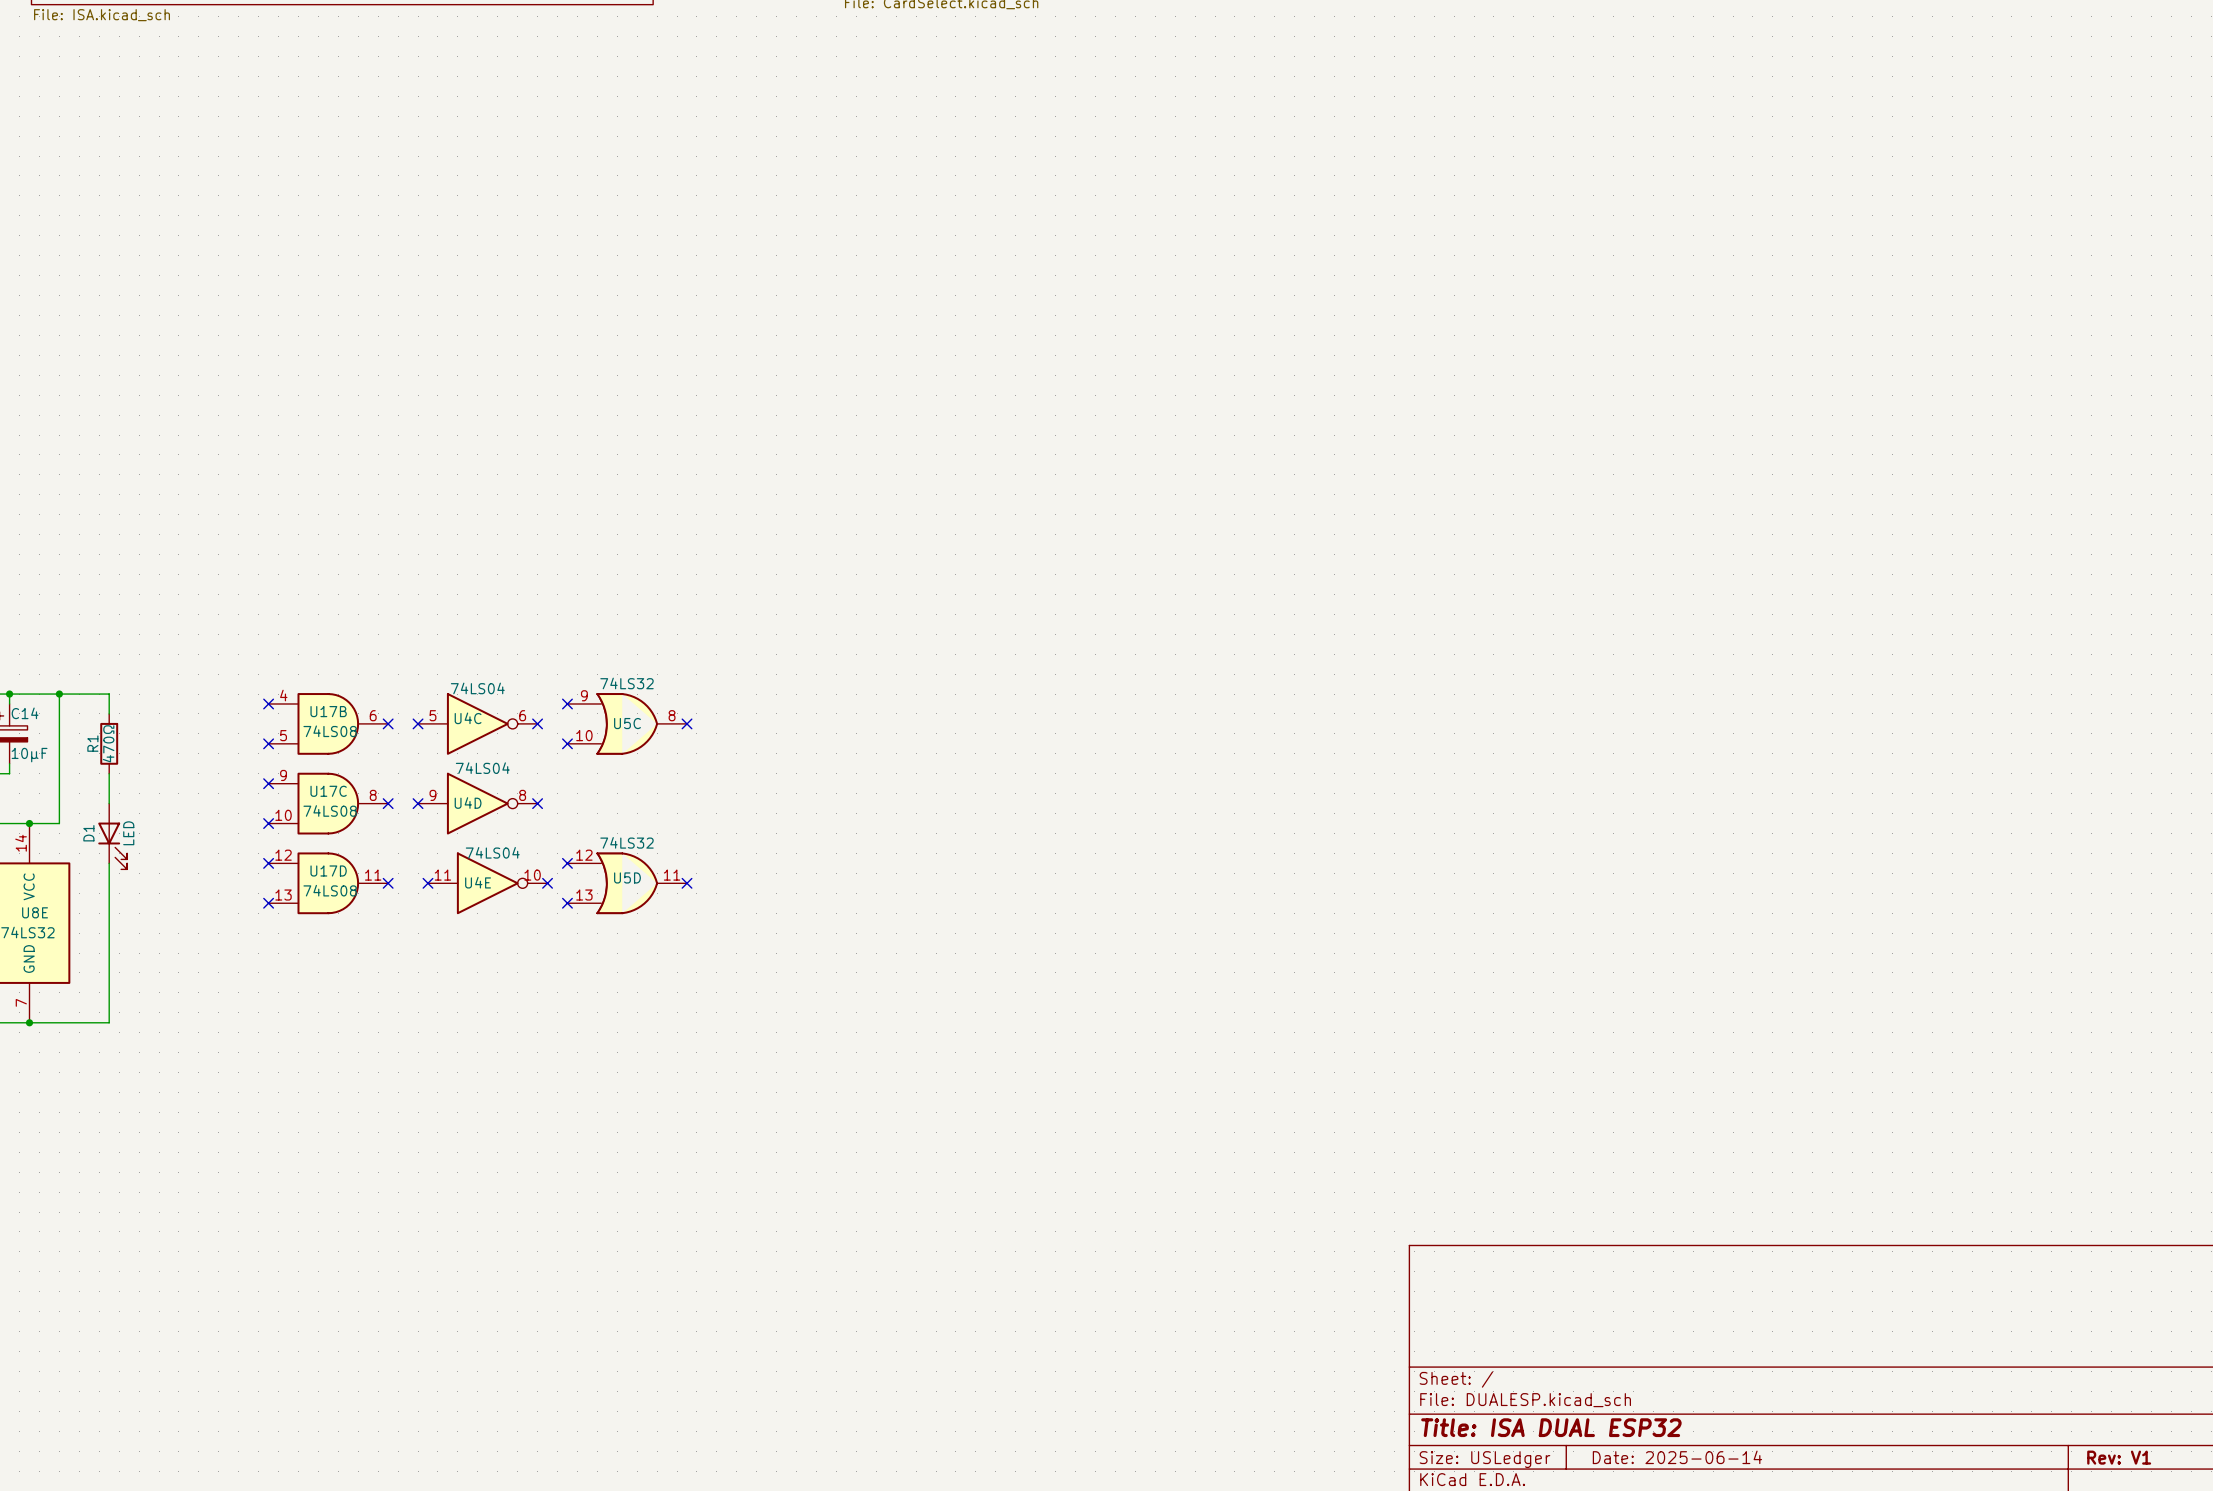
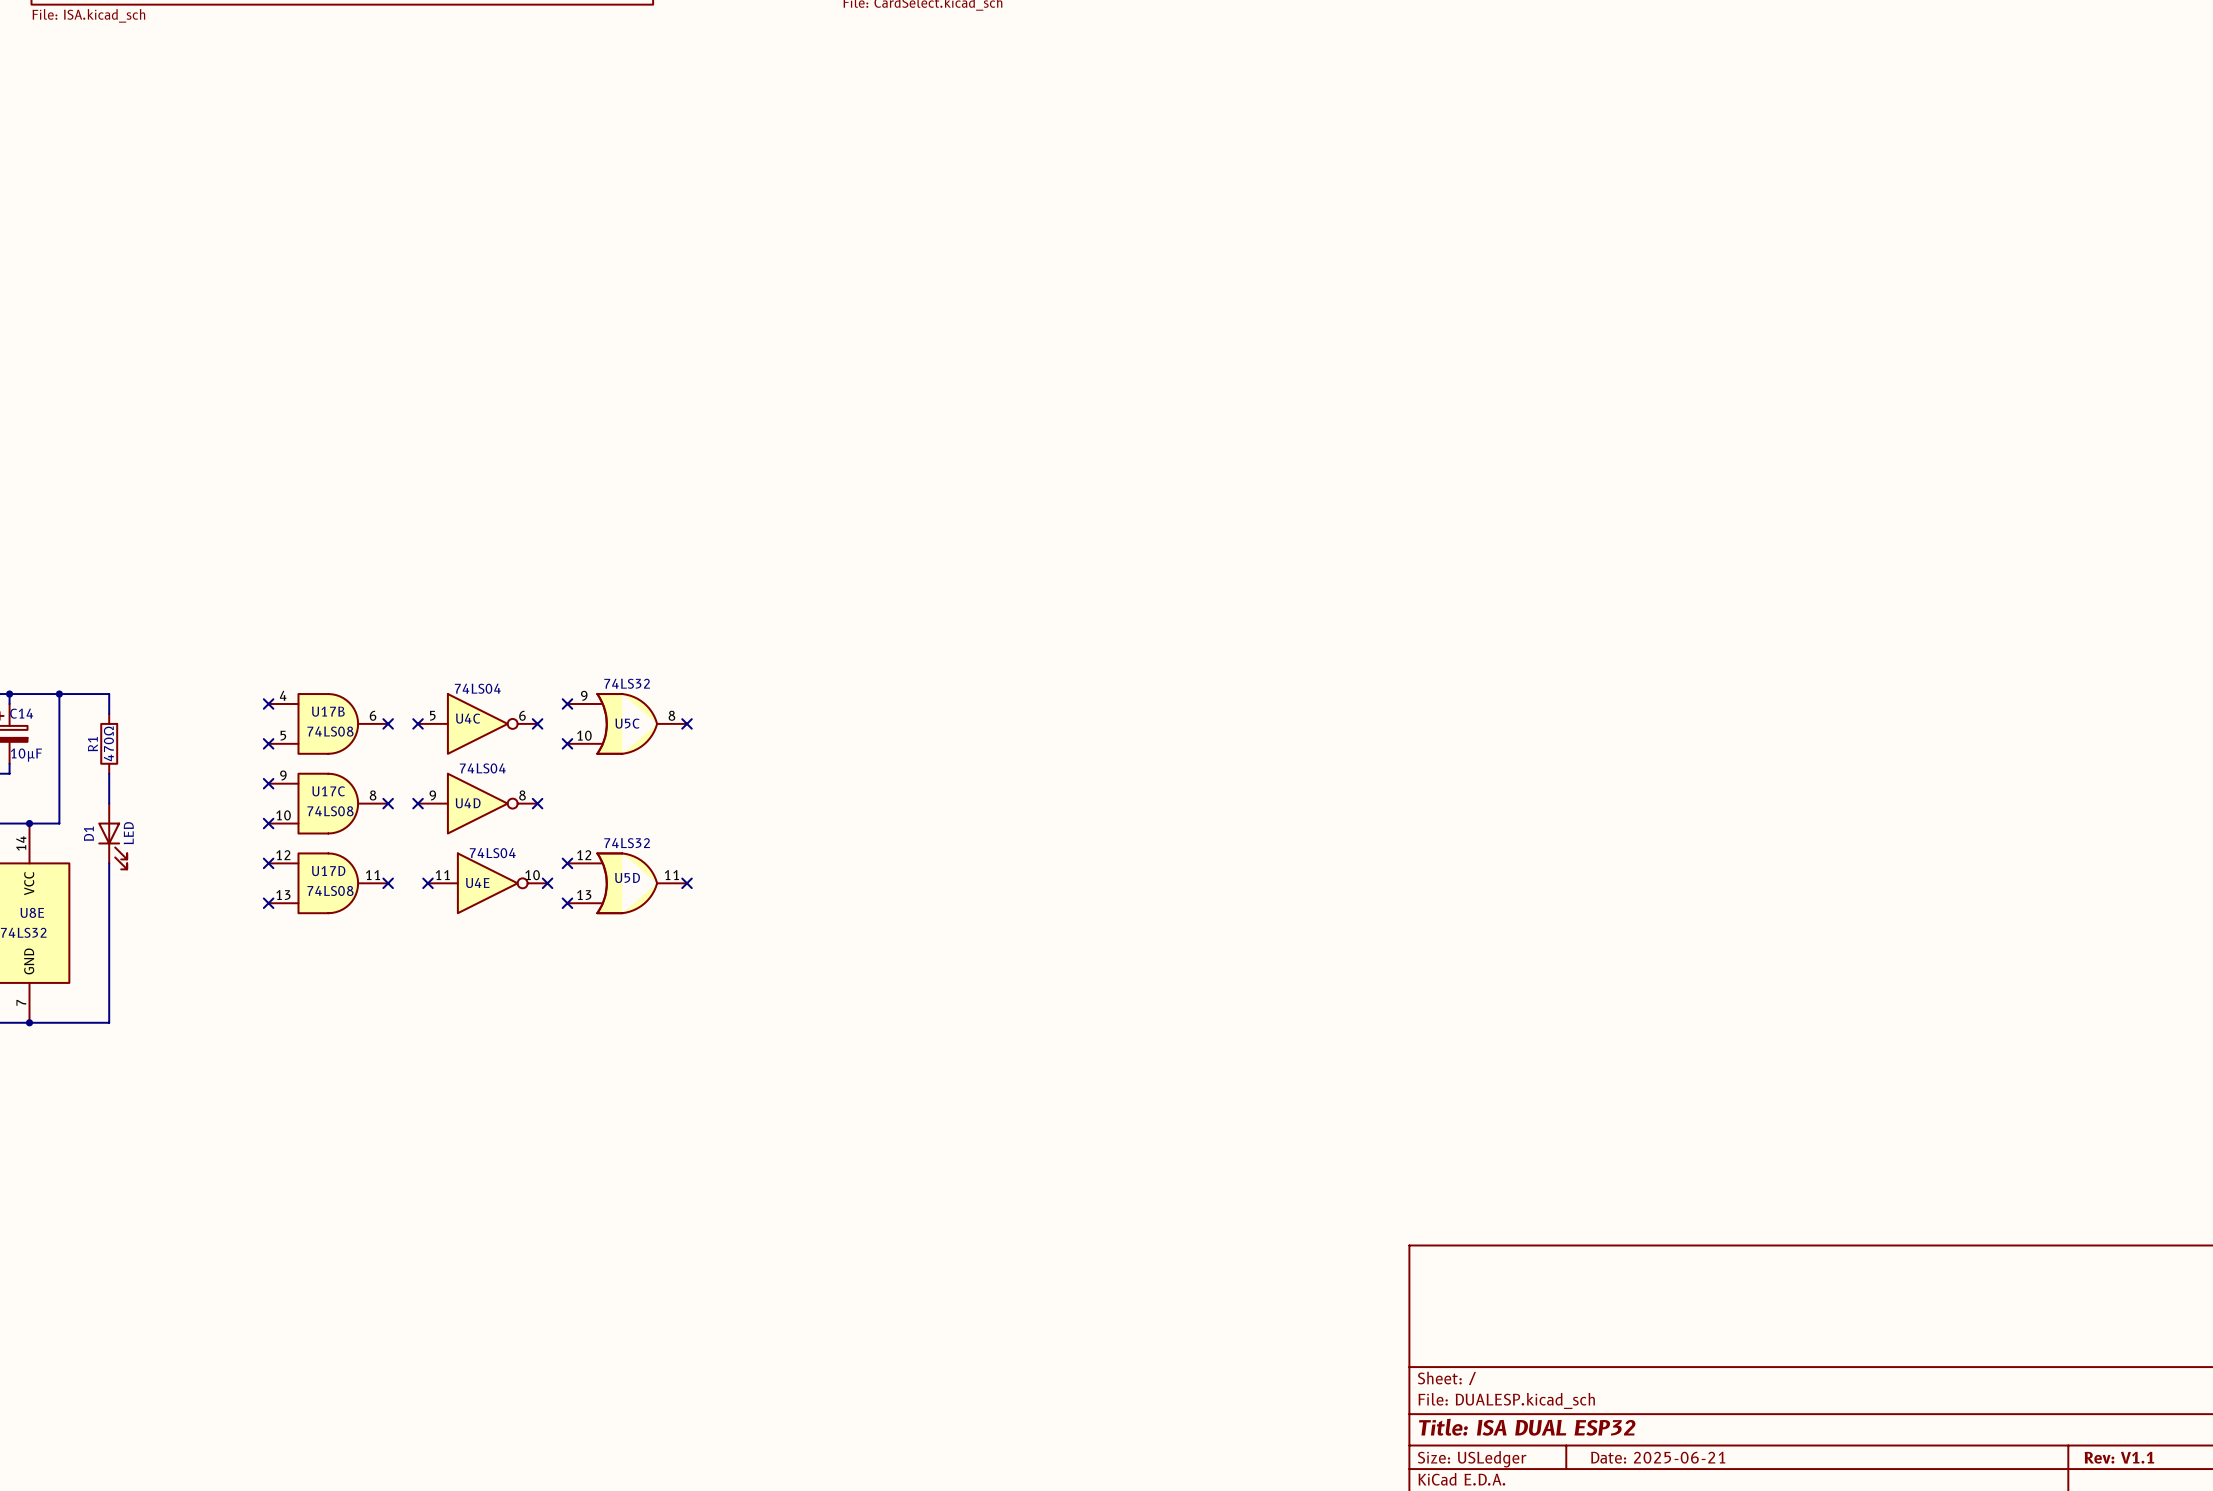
title block: Date: 2025-06-14 (1677, 1457) -> Date: 2025-06-21 (1658, 1457)
title block: Rev: V1 (2119, 1457) -> Rev: V1.1 (2119, 1457)

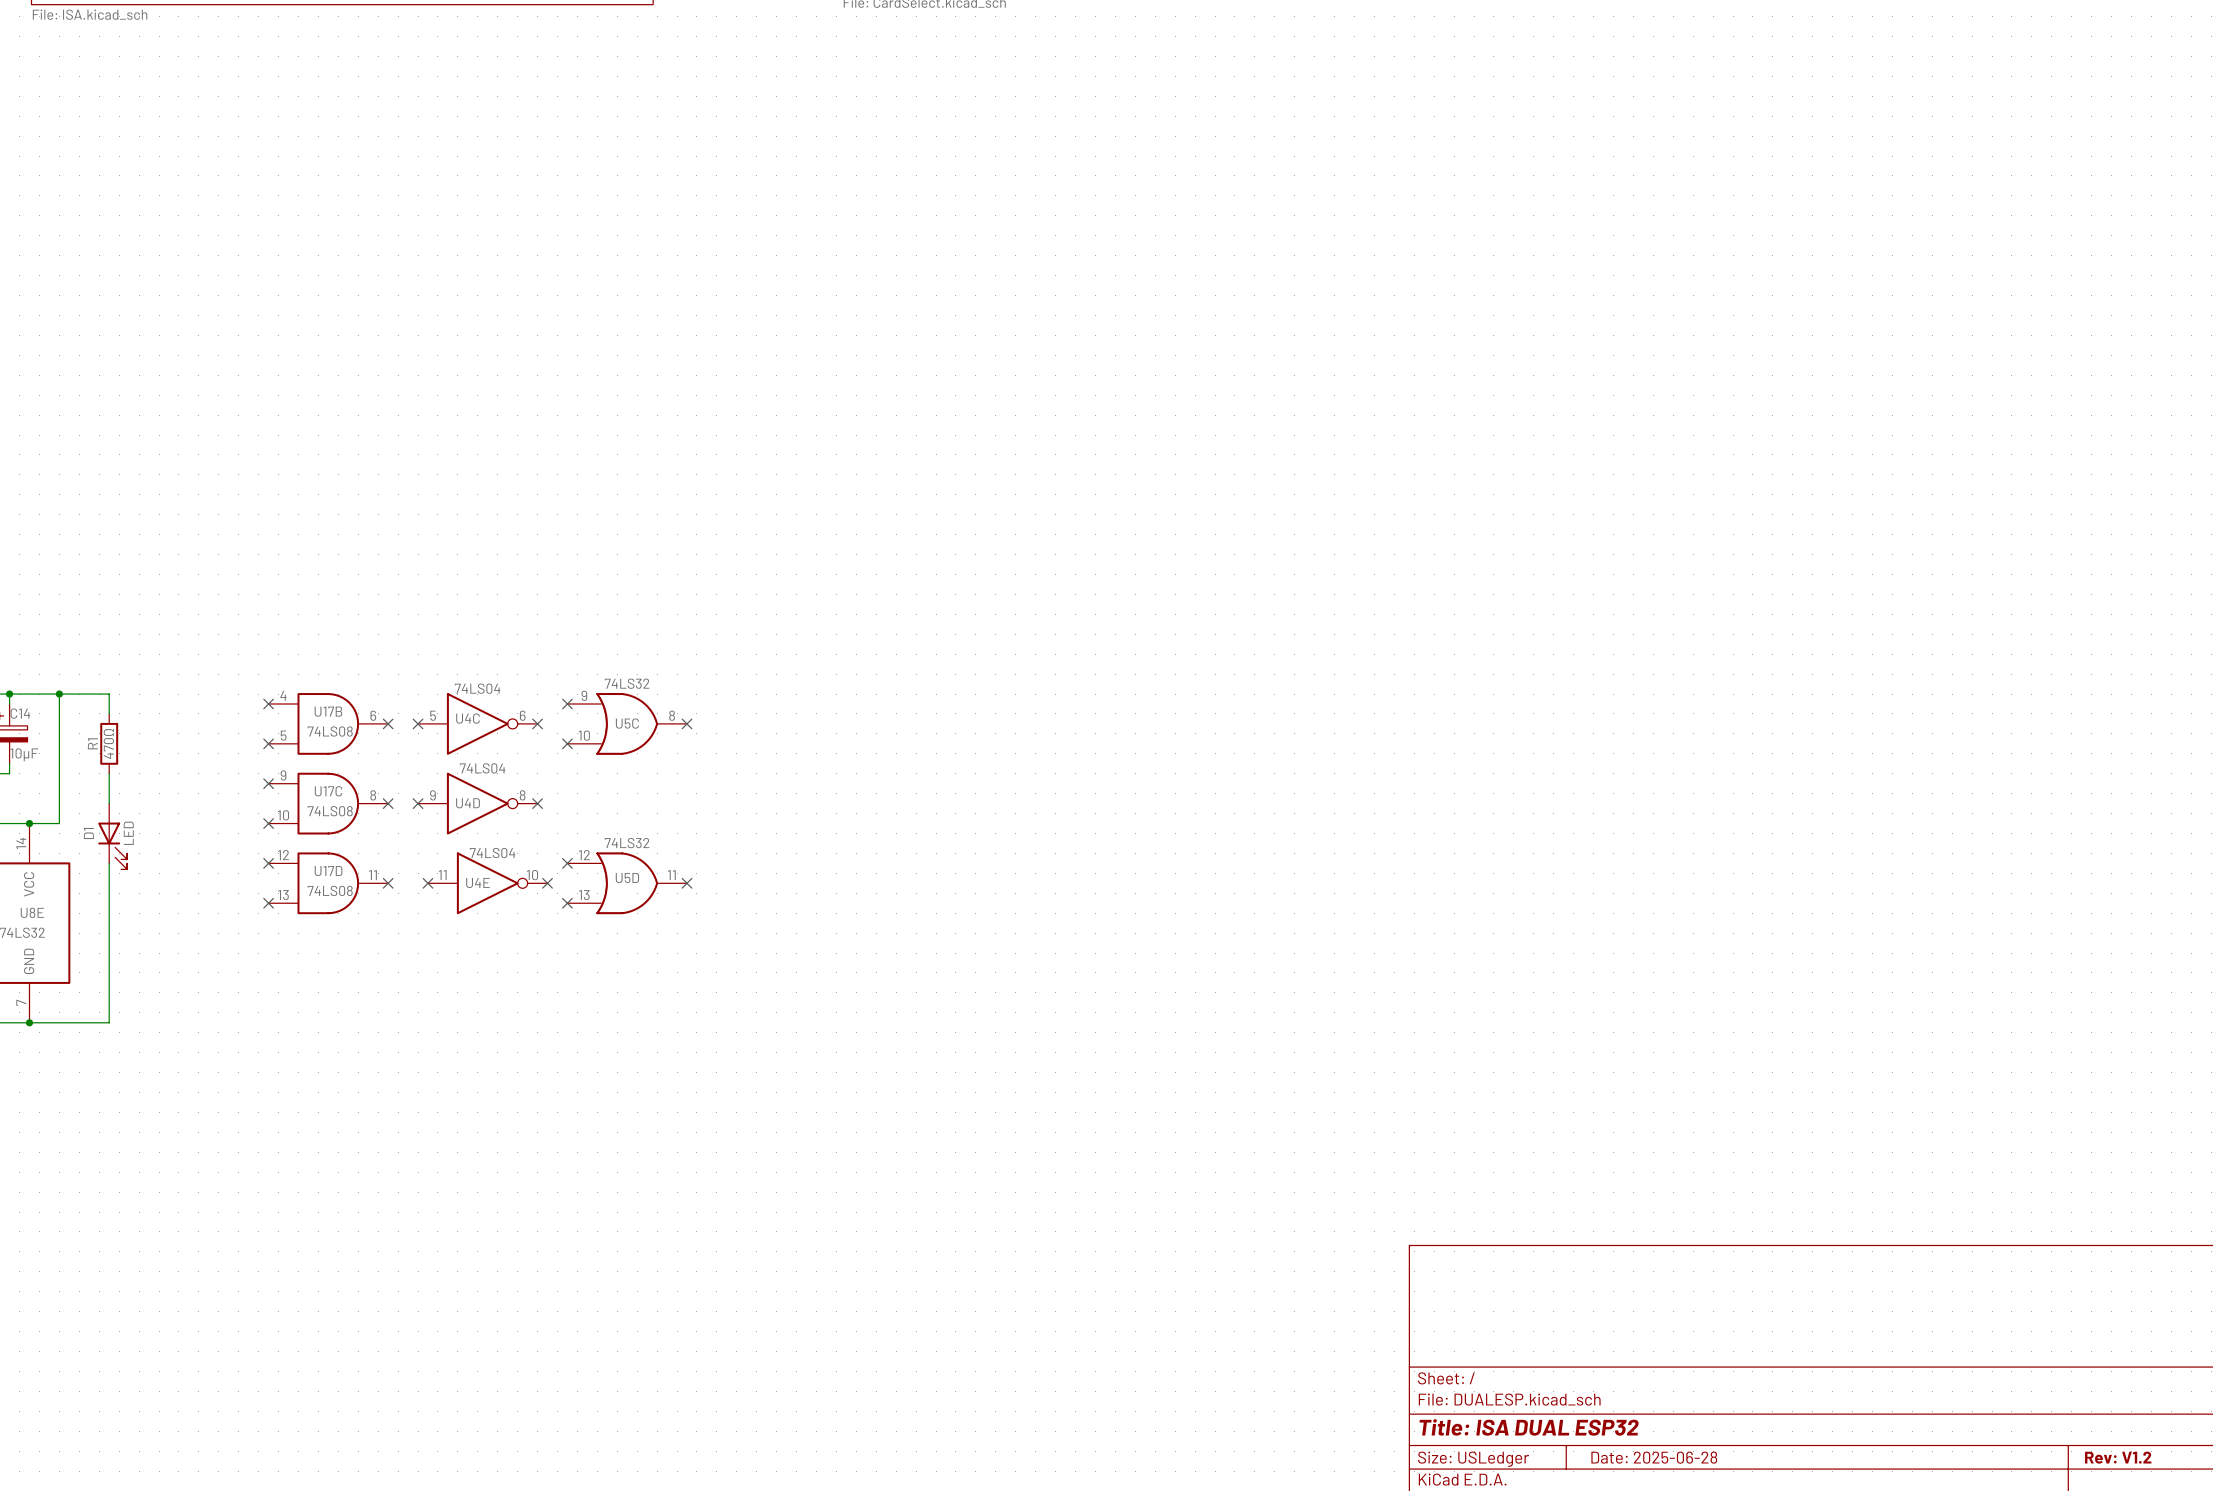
title block: Date: 2025-06-21 (1658, 1457) -> Date: 2025-06-28 (1654, 1457)
title block: Rev: V1.1 (2119, 1457) -> Rev: V1.2 (2118, 1457)

